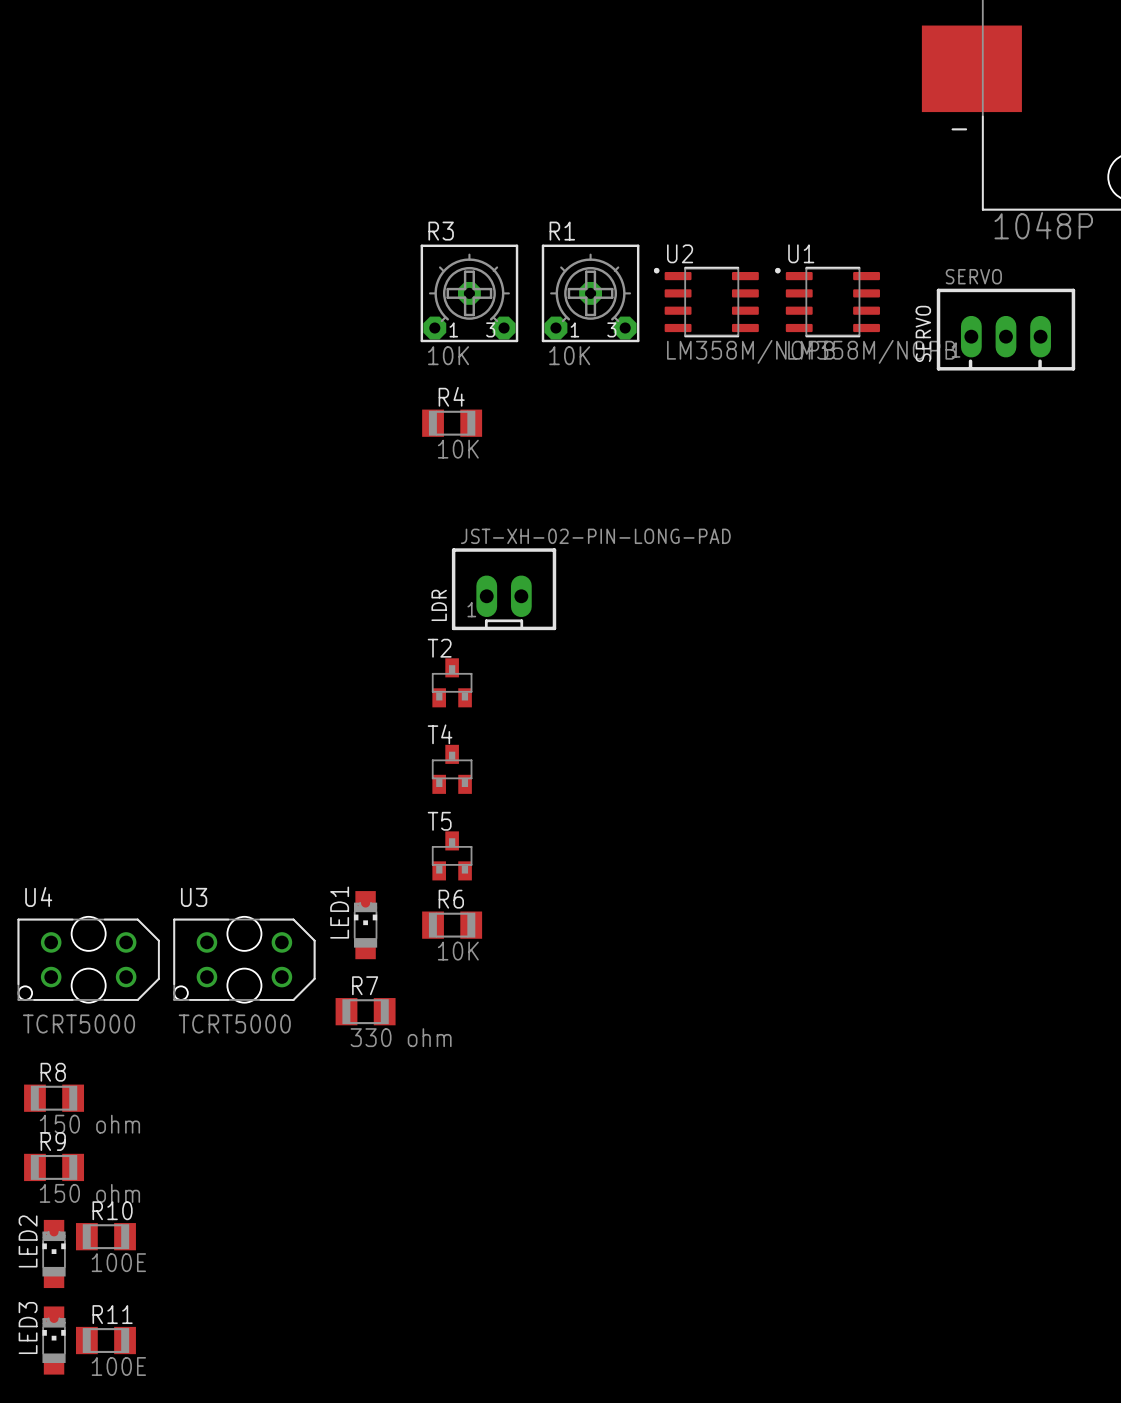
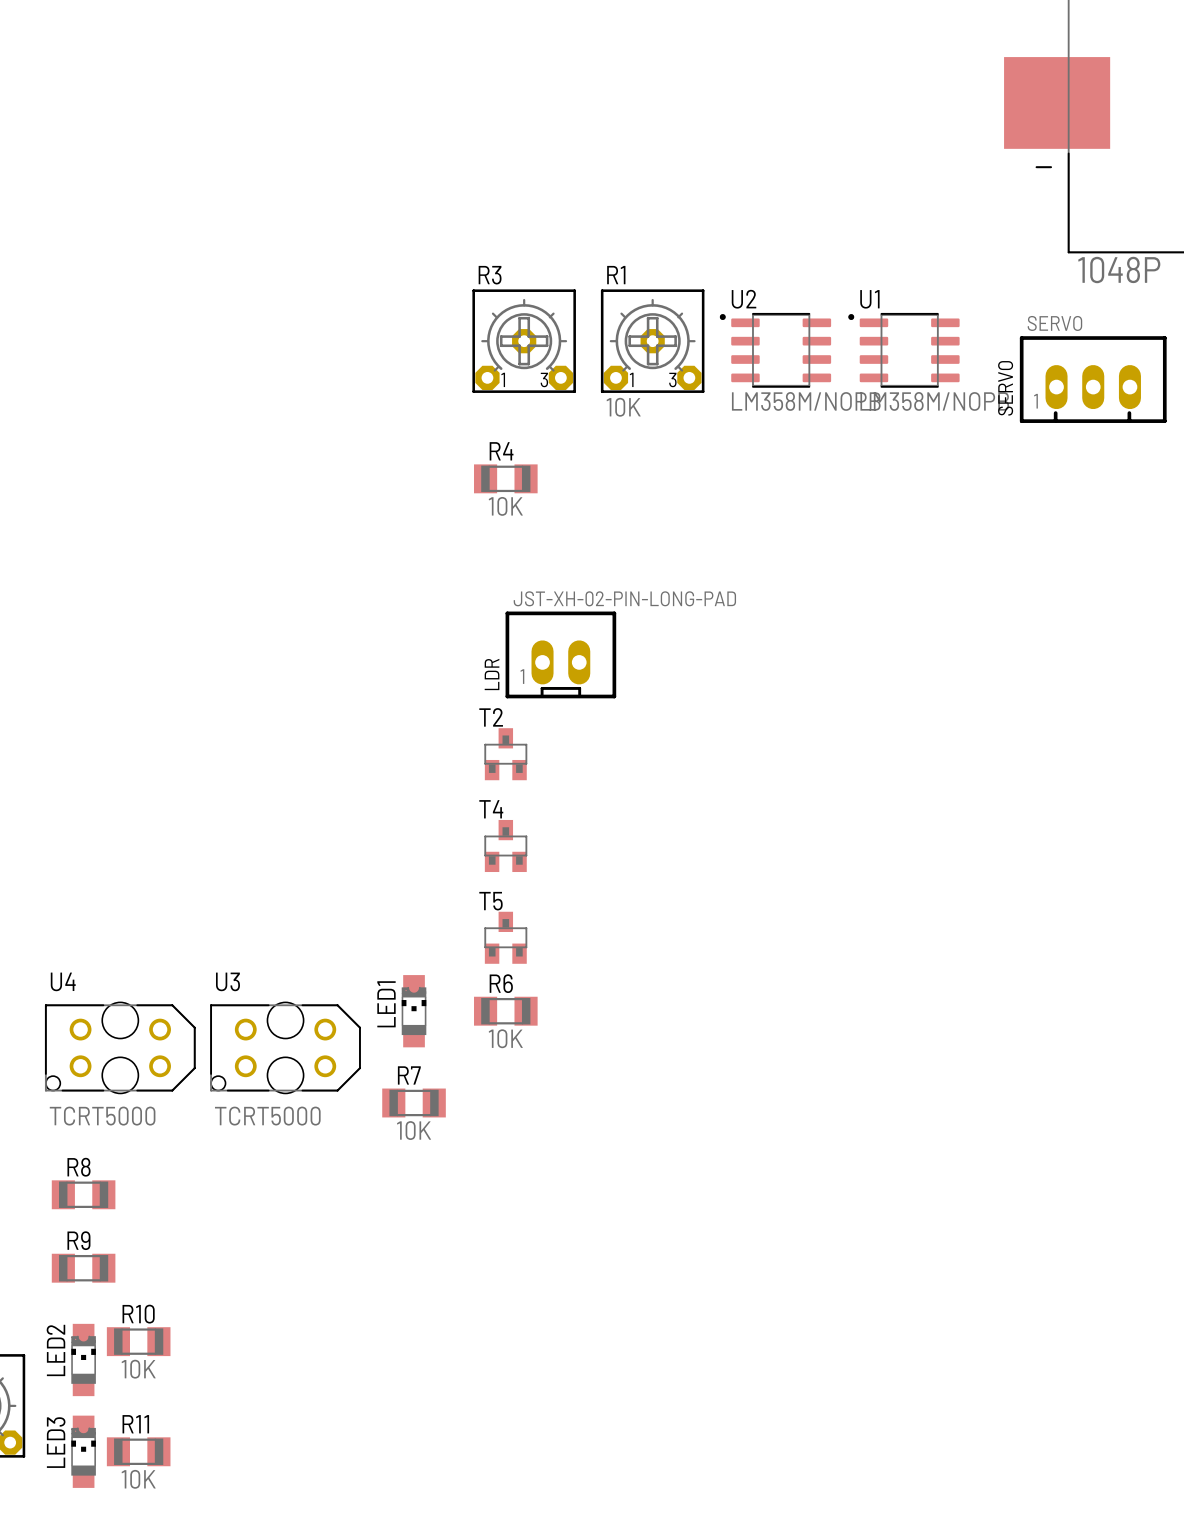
R3 value: 10K (448, 355) -> none
R7 value: 330 ohm (401, 1037) -> 10K (414, 1130)
R8 value: 150 ohm (89, 1124) -> none
R9 value: 150 ohm (89, 1193) -> none
R10 value: 100E (118, 1262) -> 10K (138, 1369)
R11 value: 100E (118, 1366) -> 10K (138, 1479)

